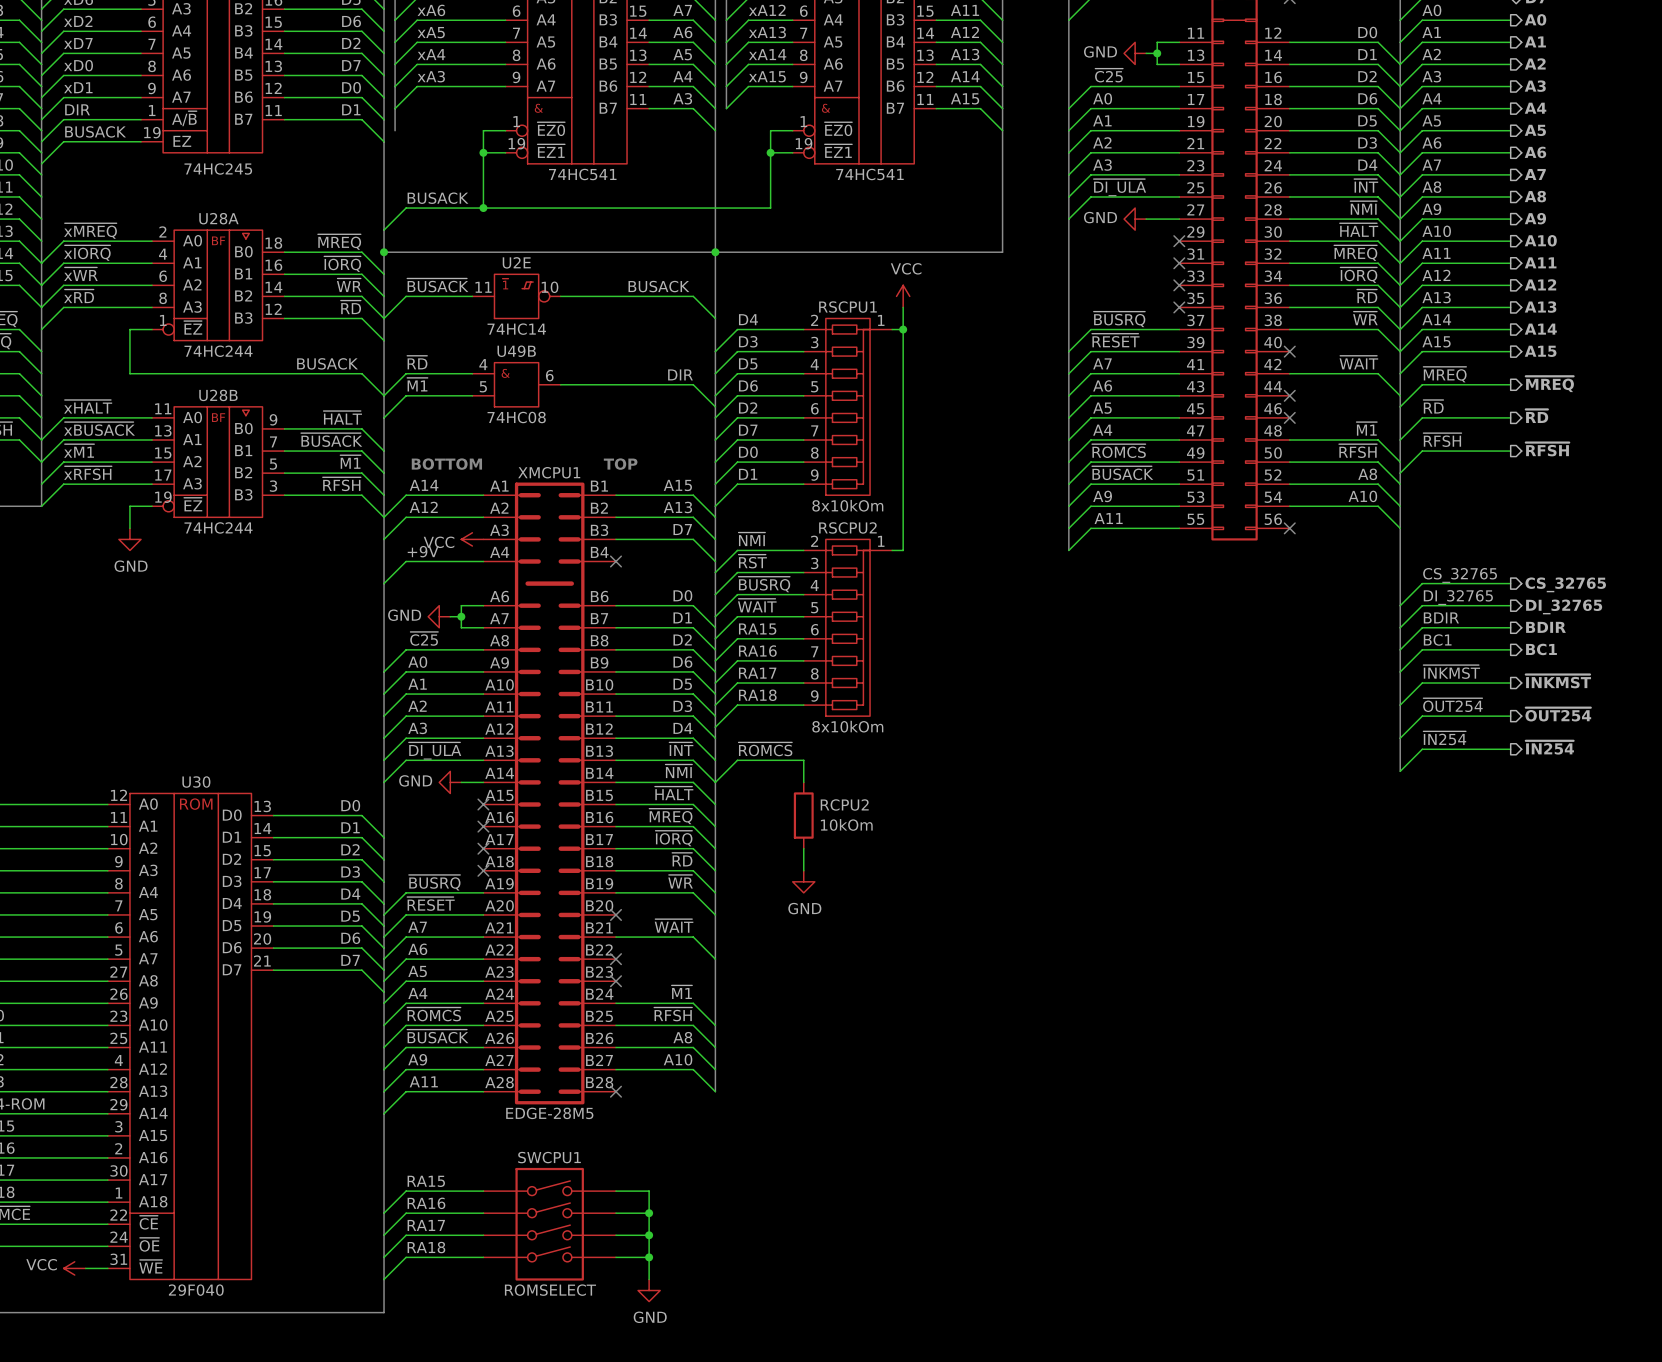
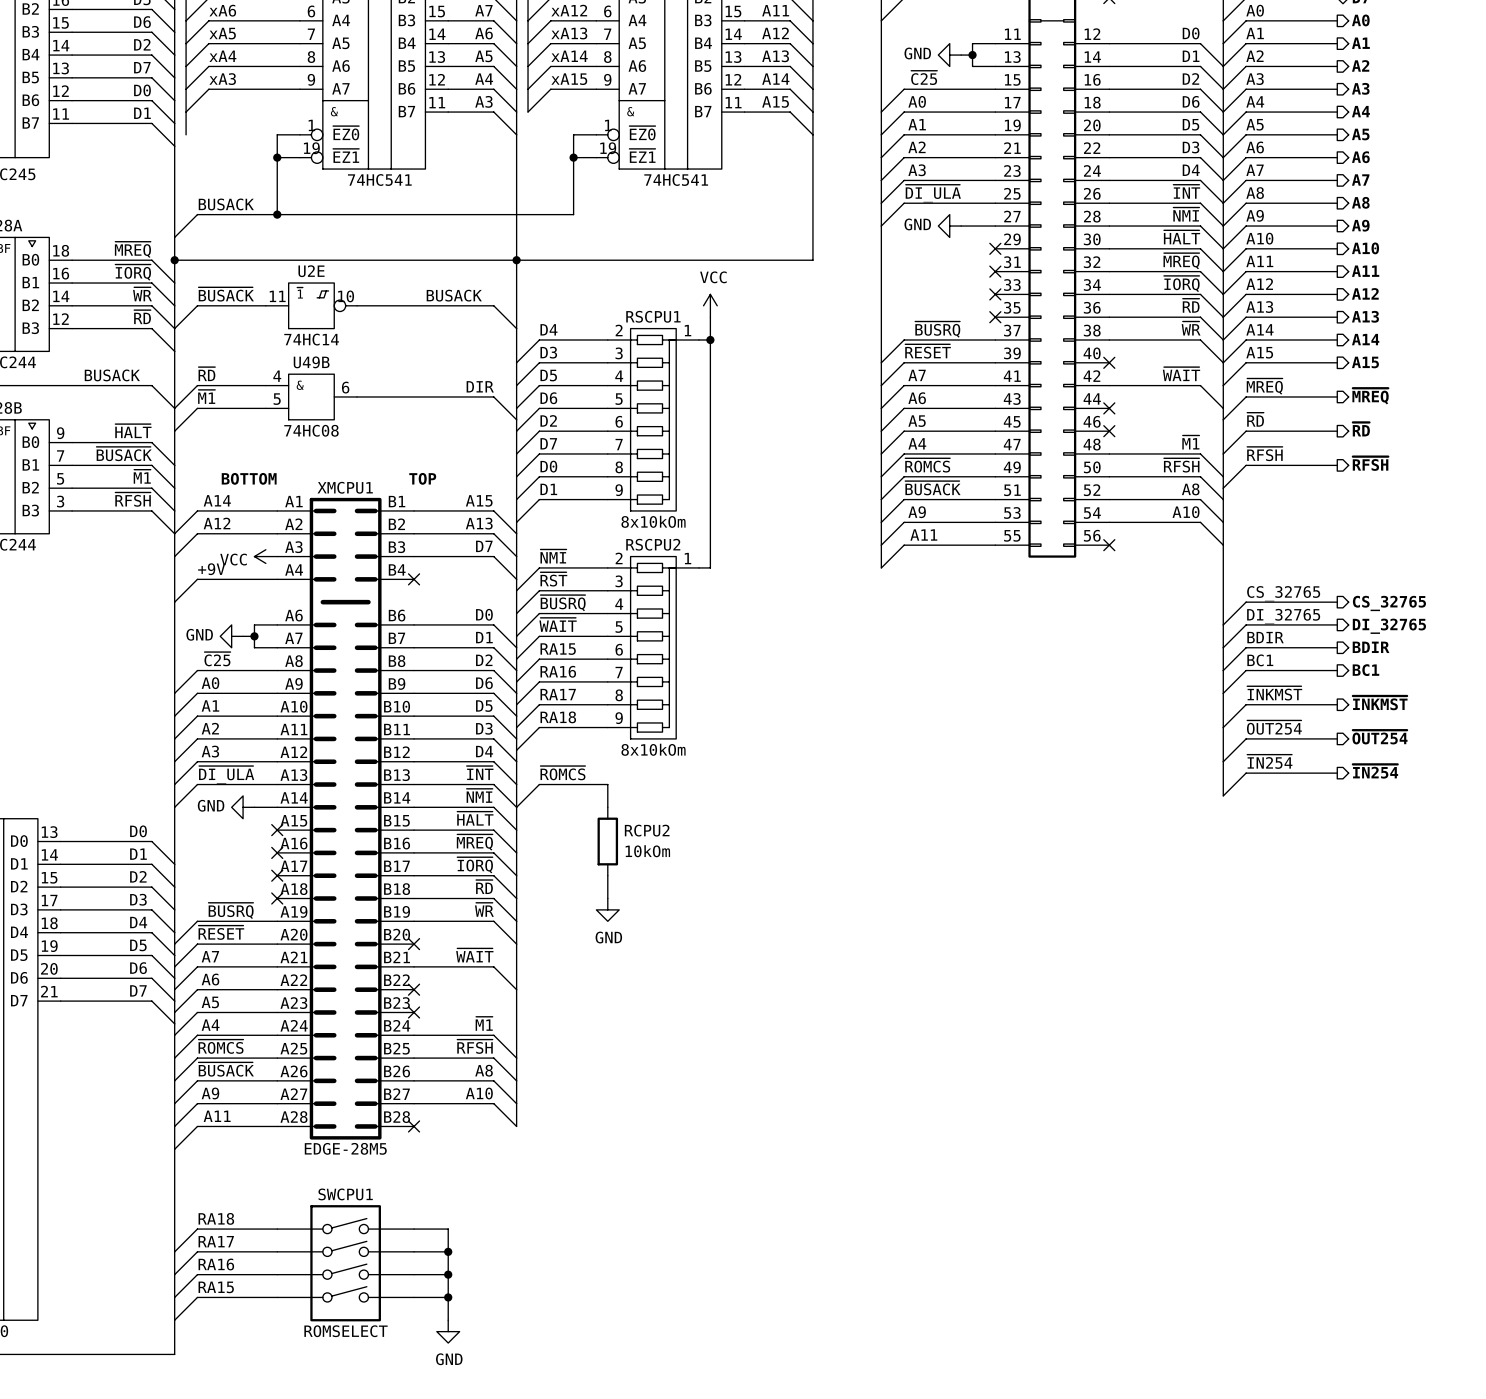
label: RA15 (426, 1181) -> RA18 (216, 1218)
label: RA16 (426, 1203) -> RA17 (216, 1241)
label: RA17 (426, 1225) -> RA16 (216, 1264)
label: RA18 (426, 1247) -> RA15 (216, 1287)

